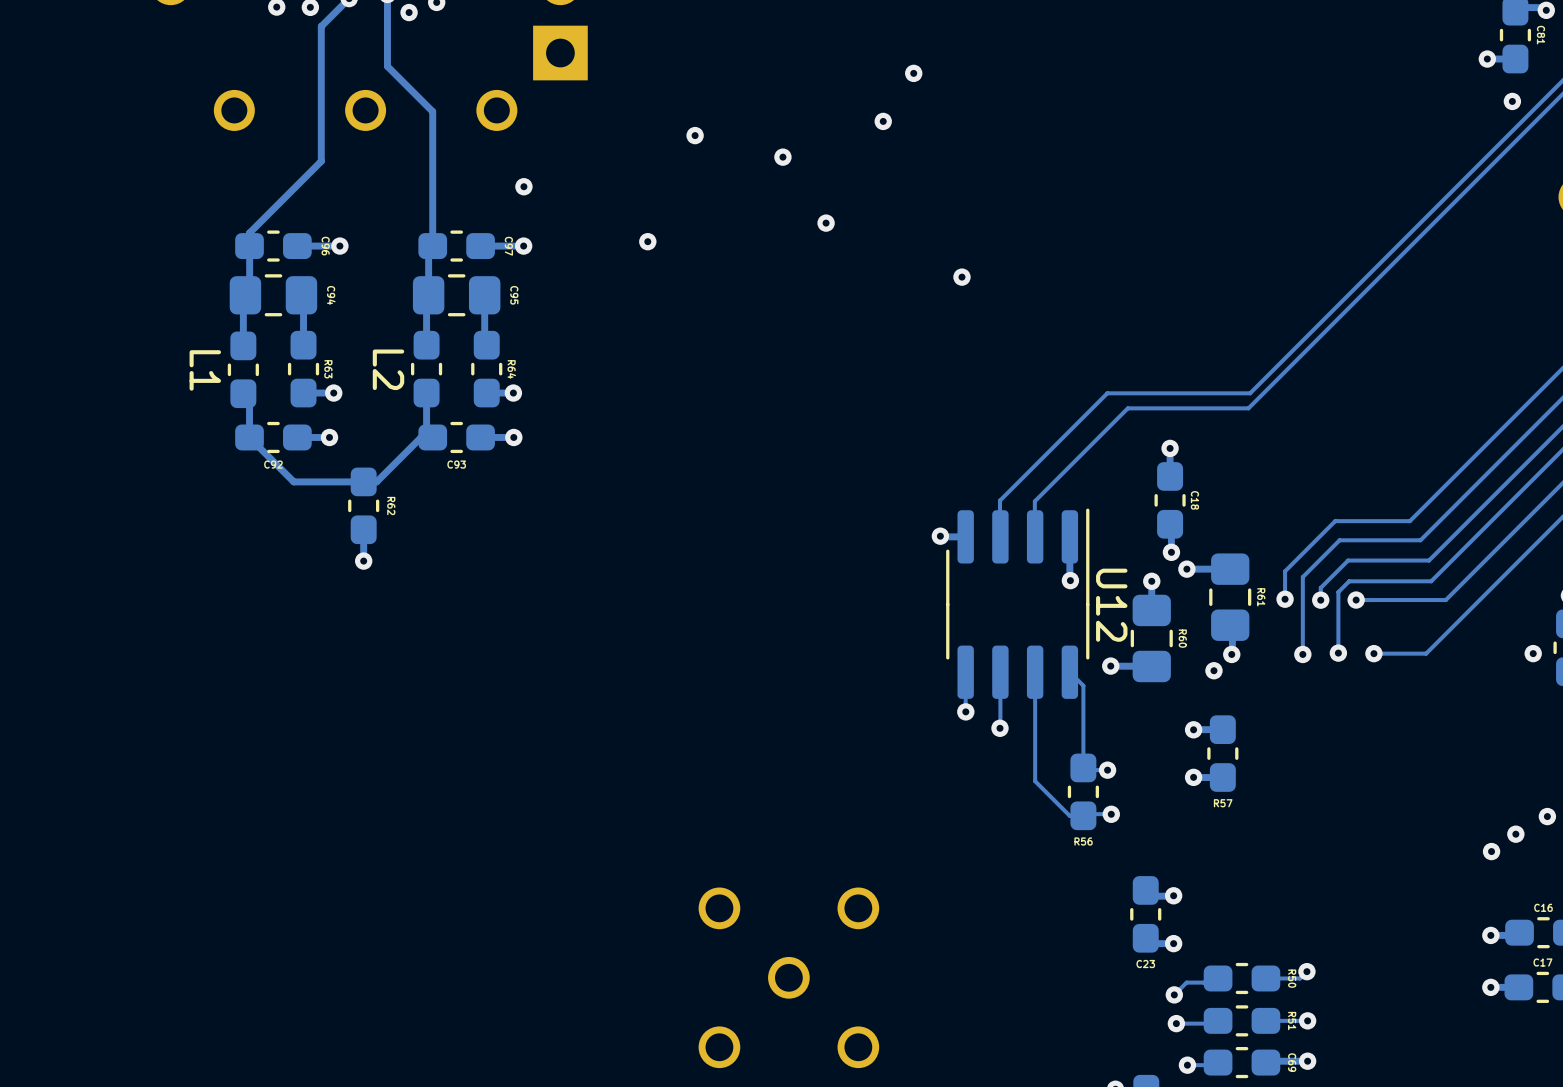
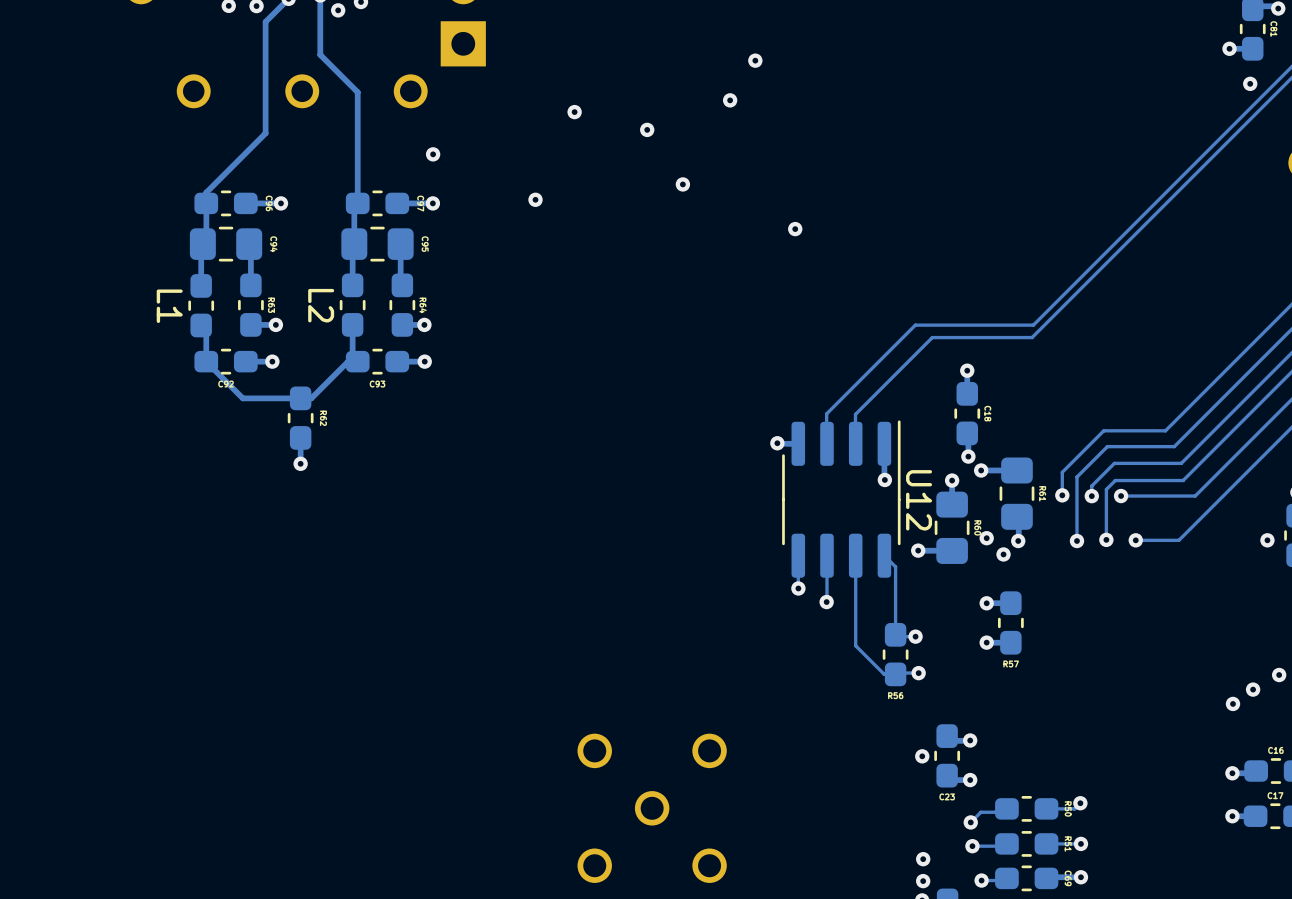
via: none -> (986, 538)
via: none -> (922, 756)
via: none -> (923, 859)
via: none -> (923, 881)

